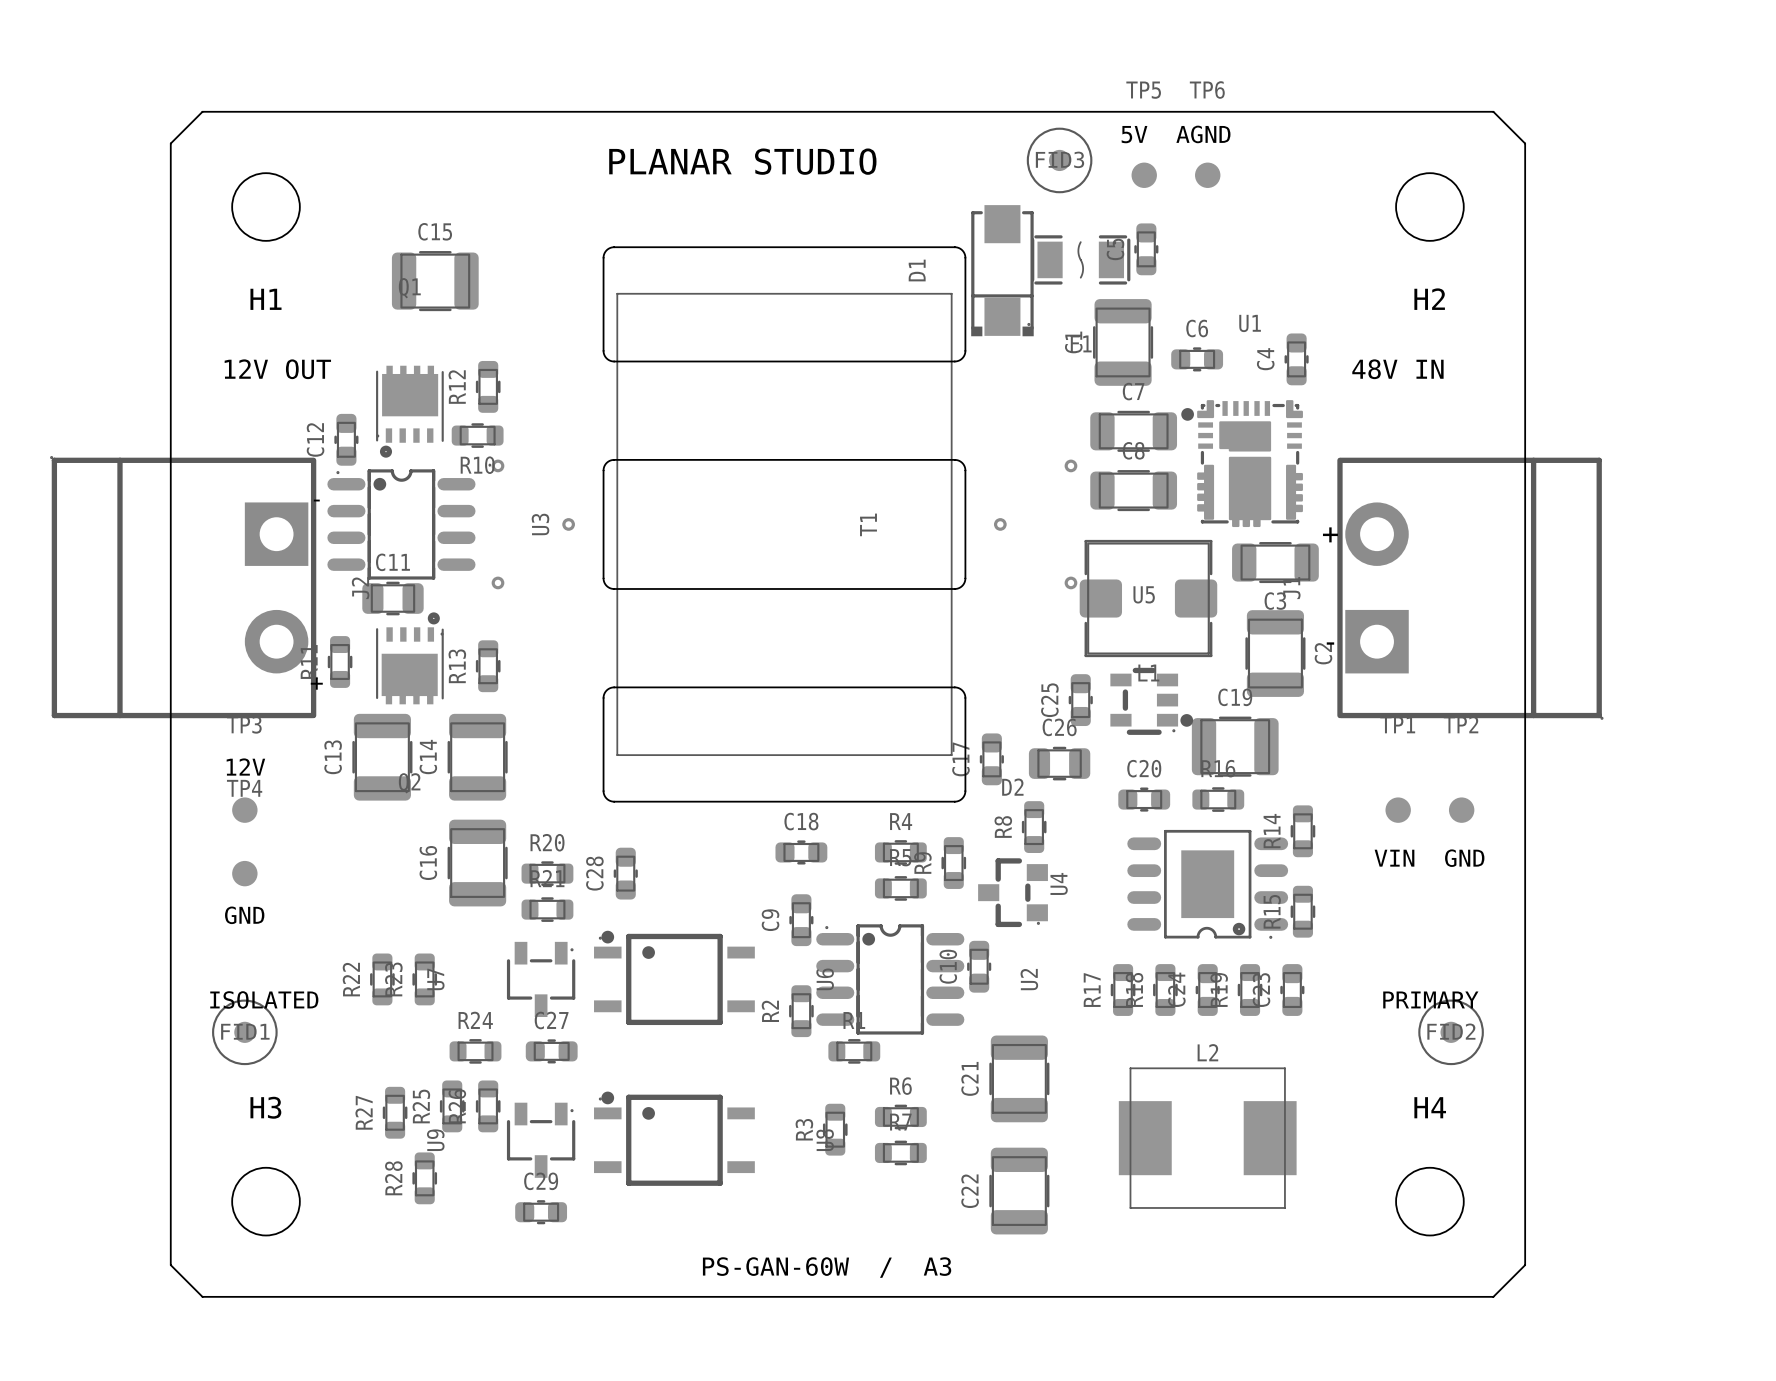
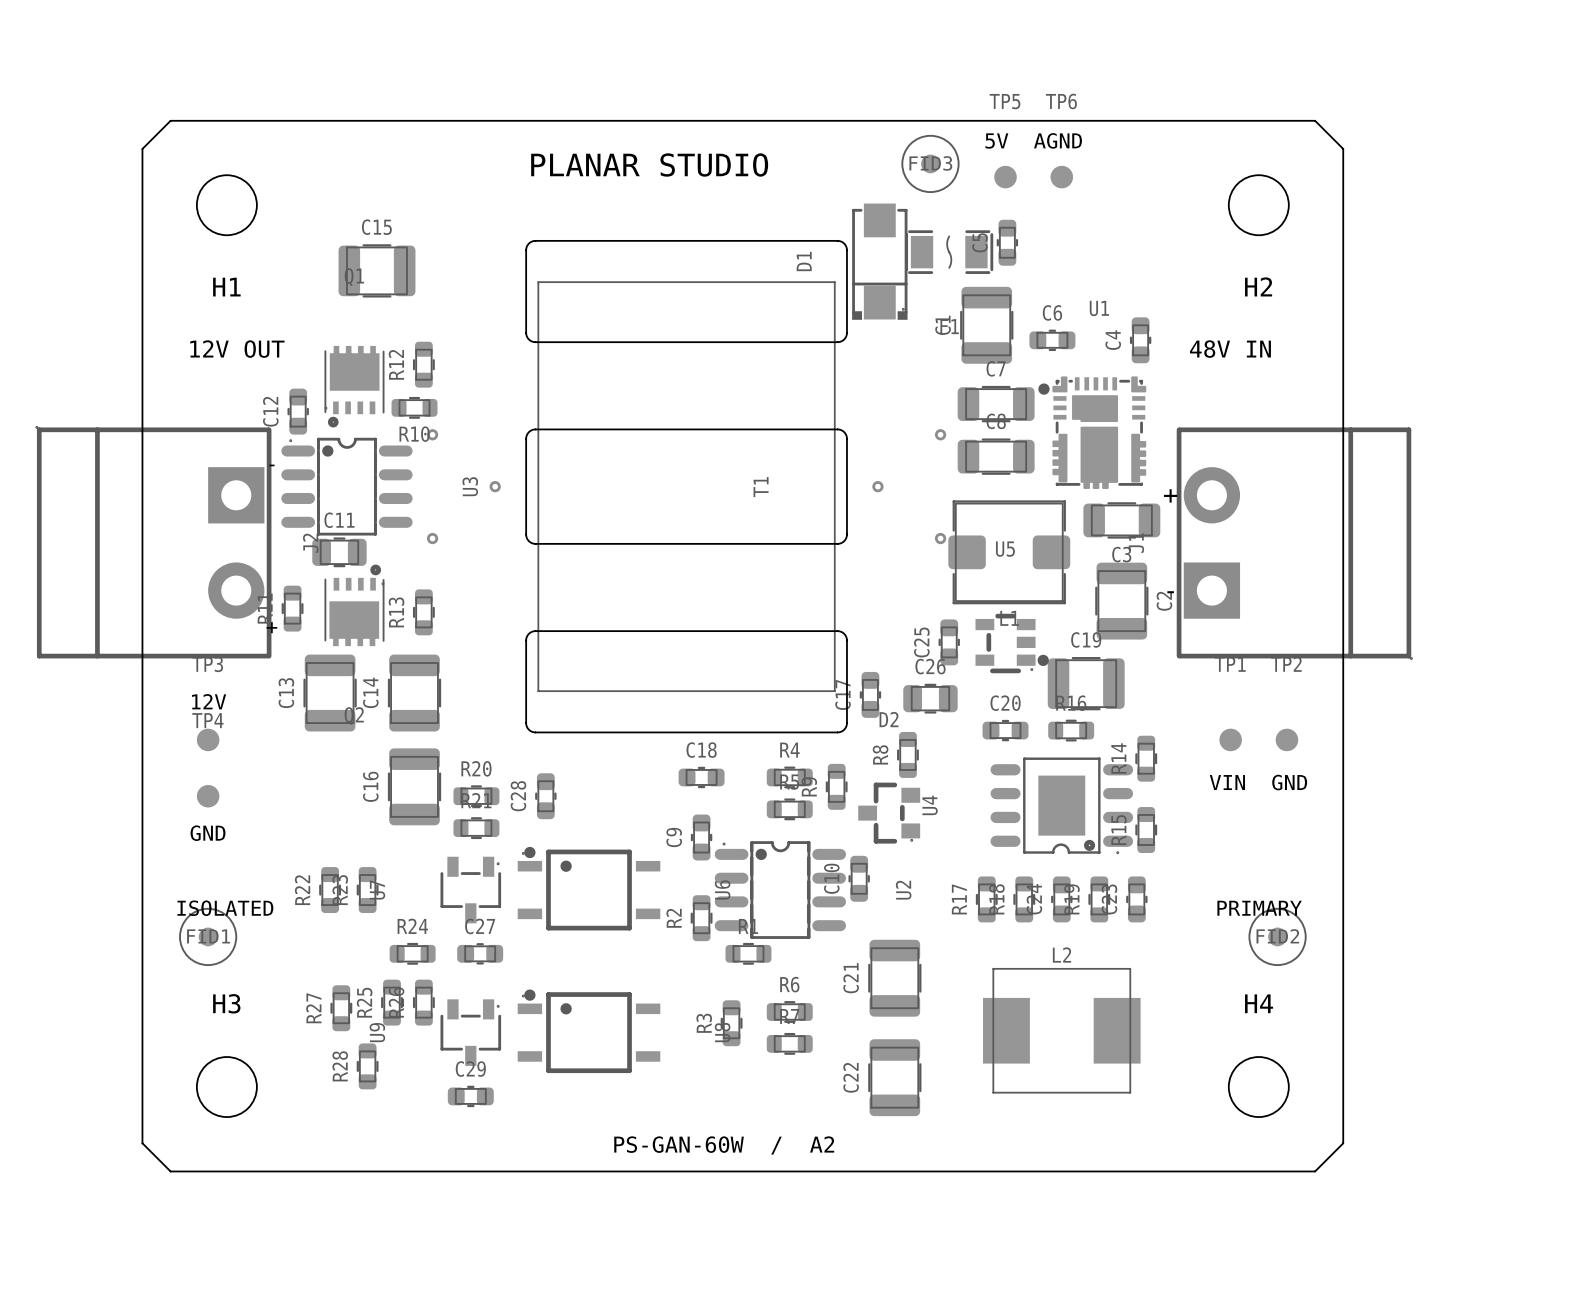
text: PS-GAN-60W / A3 (827, 1267) -> PS-GAN-60W / A2 (724, 1145)

